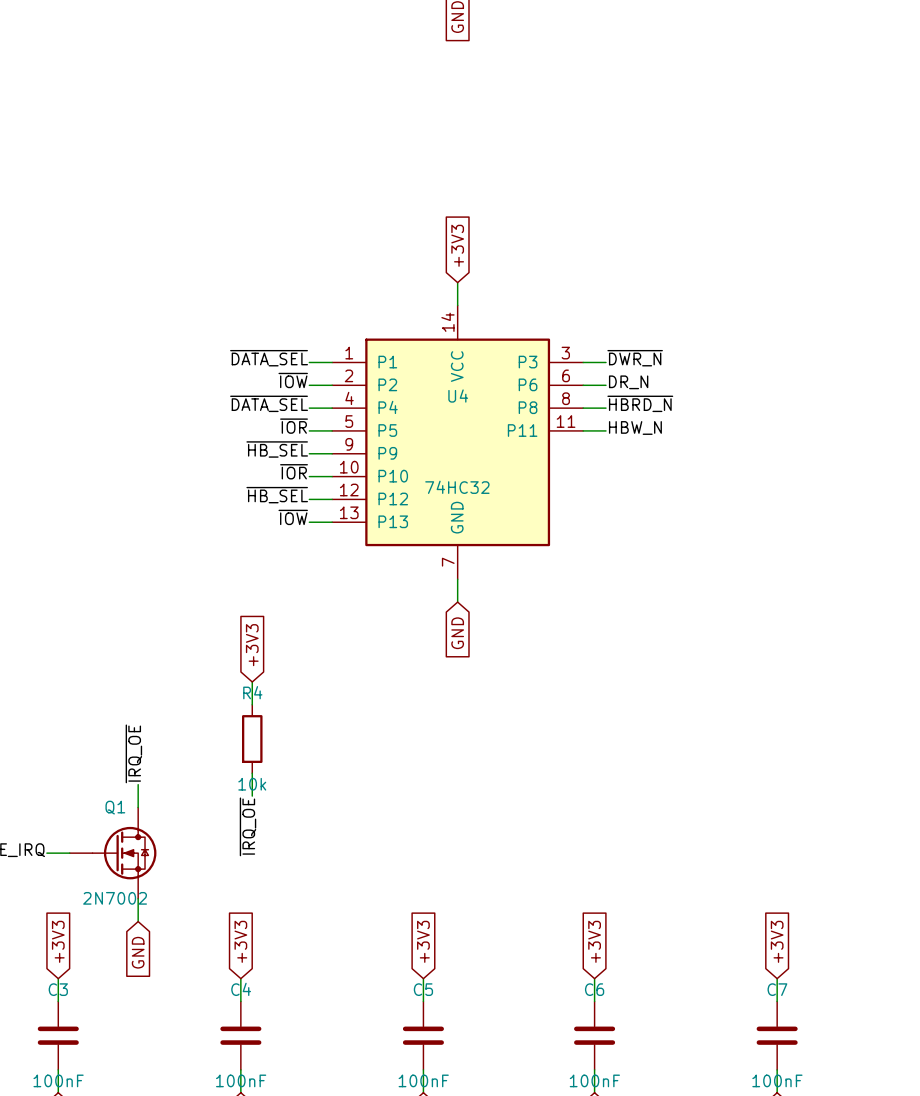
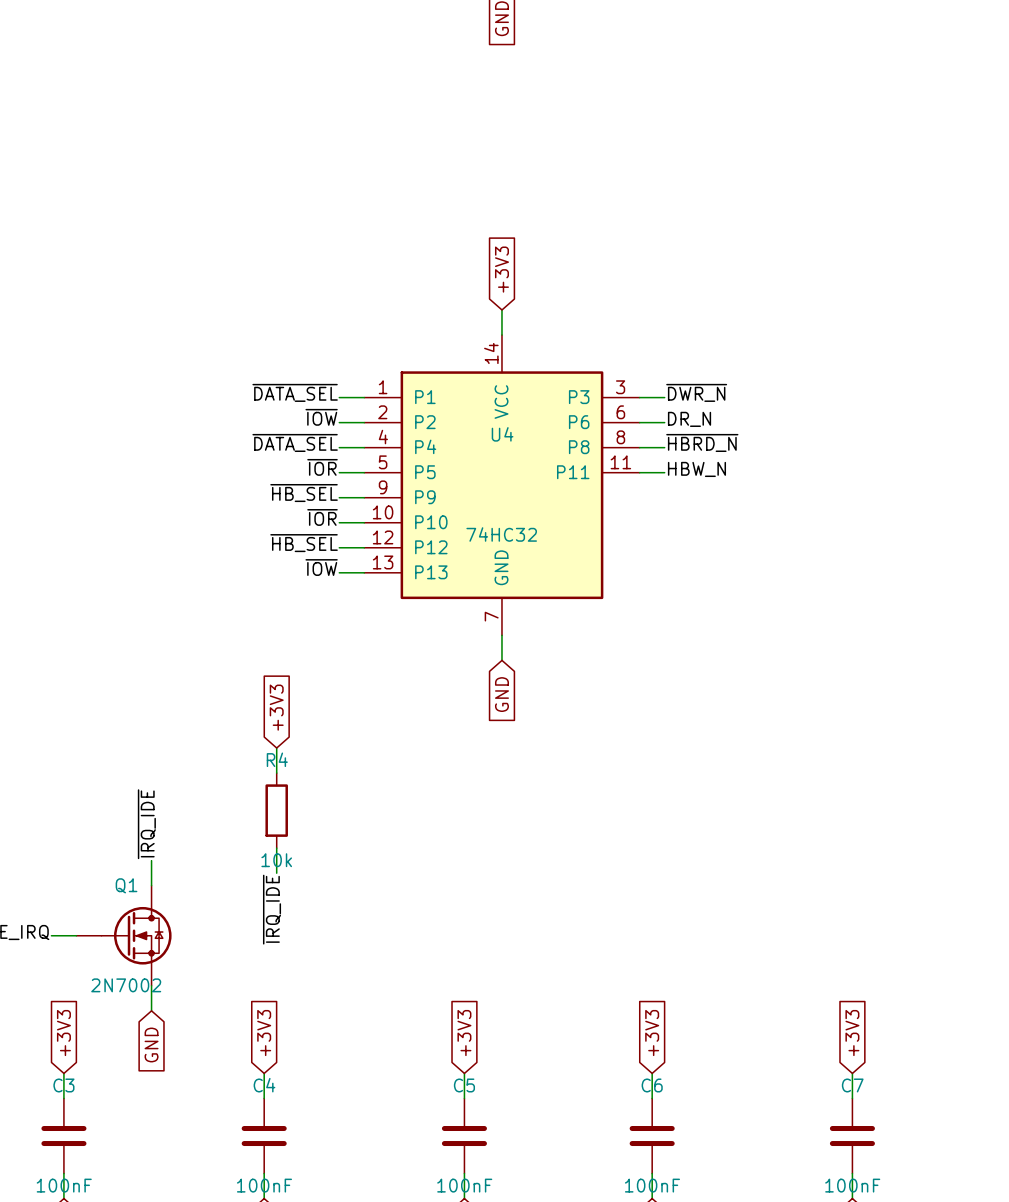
label: ~{IRQ_OE} (133, 753) -> ~{IRQ_IDE} (146, 824)
label: ~{IRQ_OE} (247, 826) -> ~{IRQ_IDE} (272, 909)

